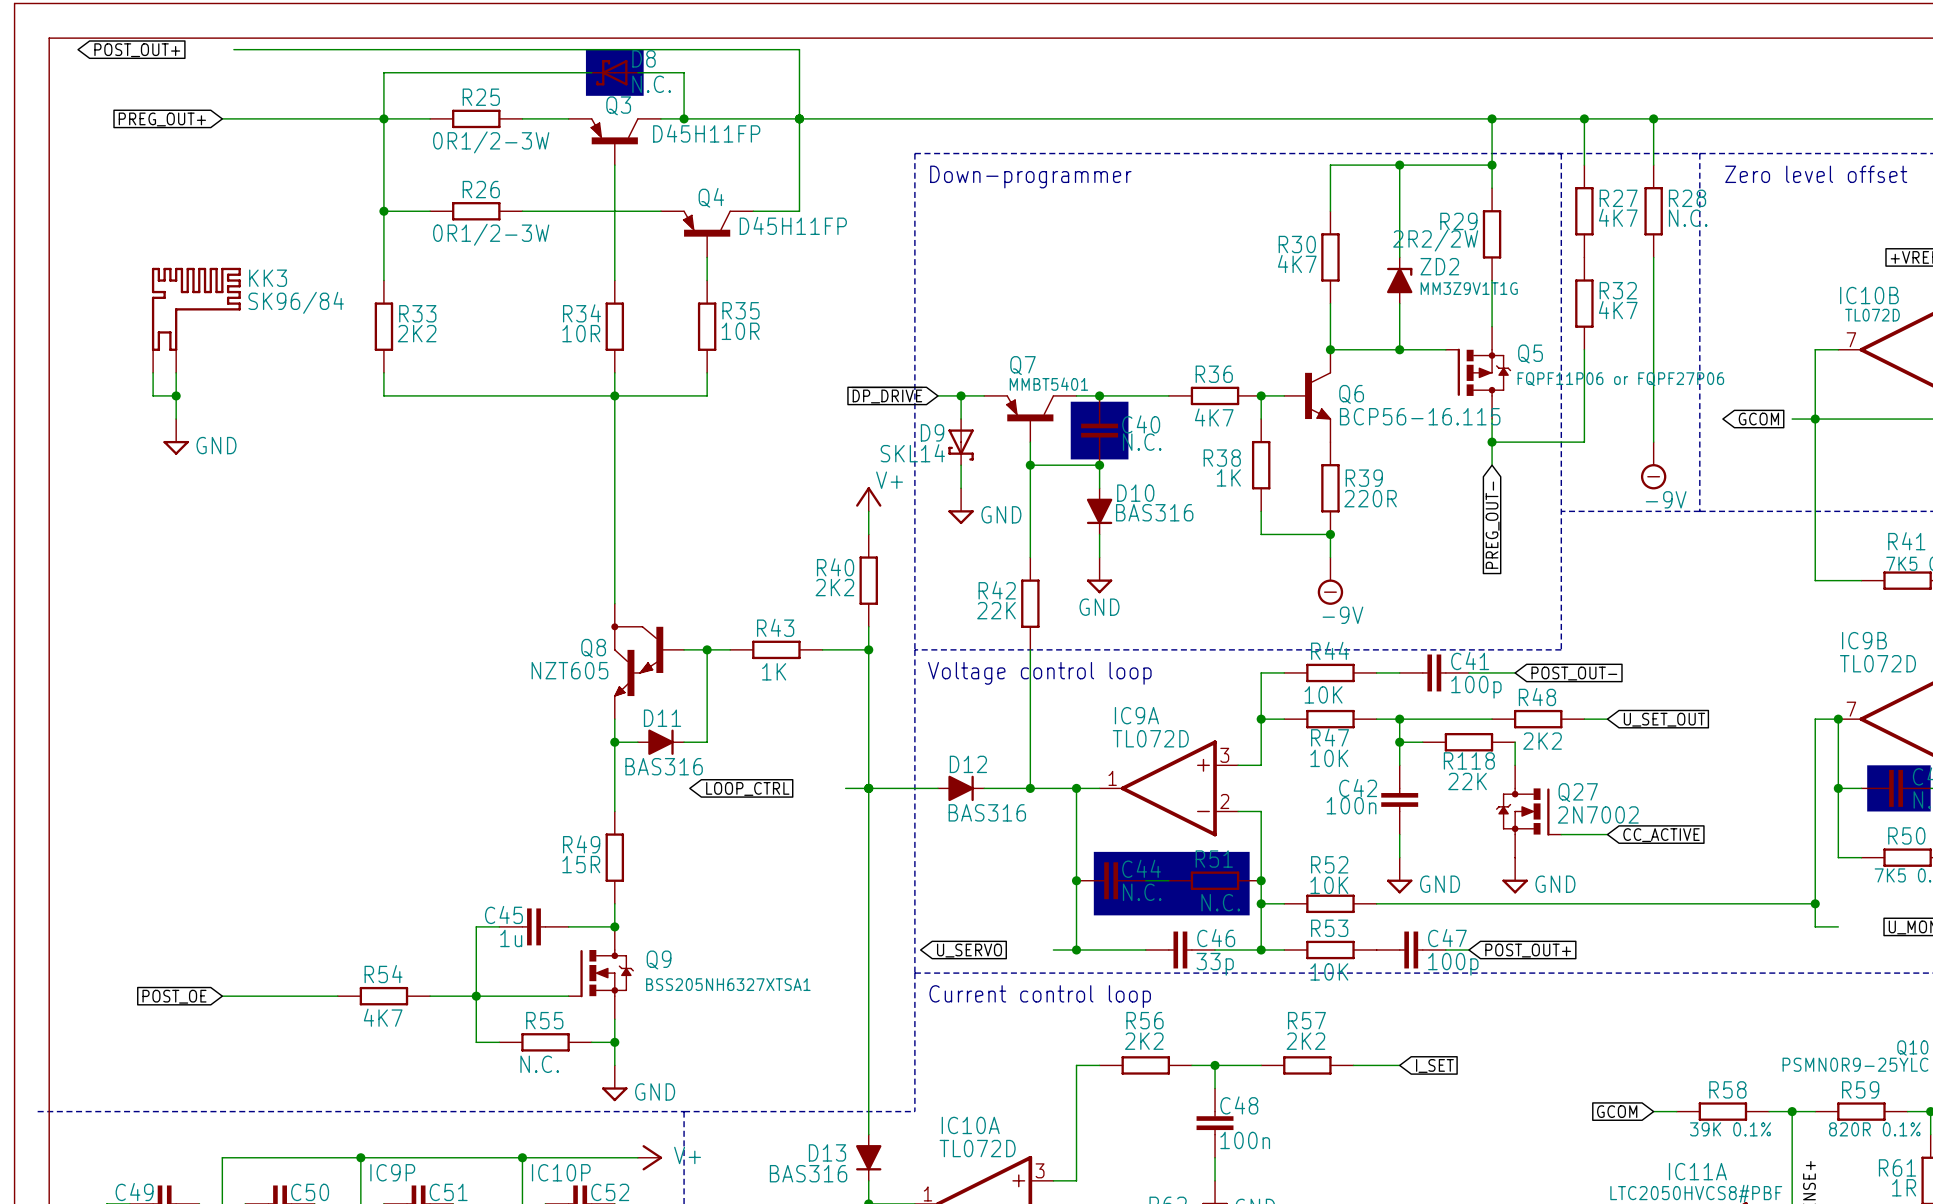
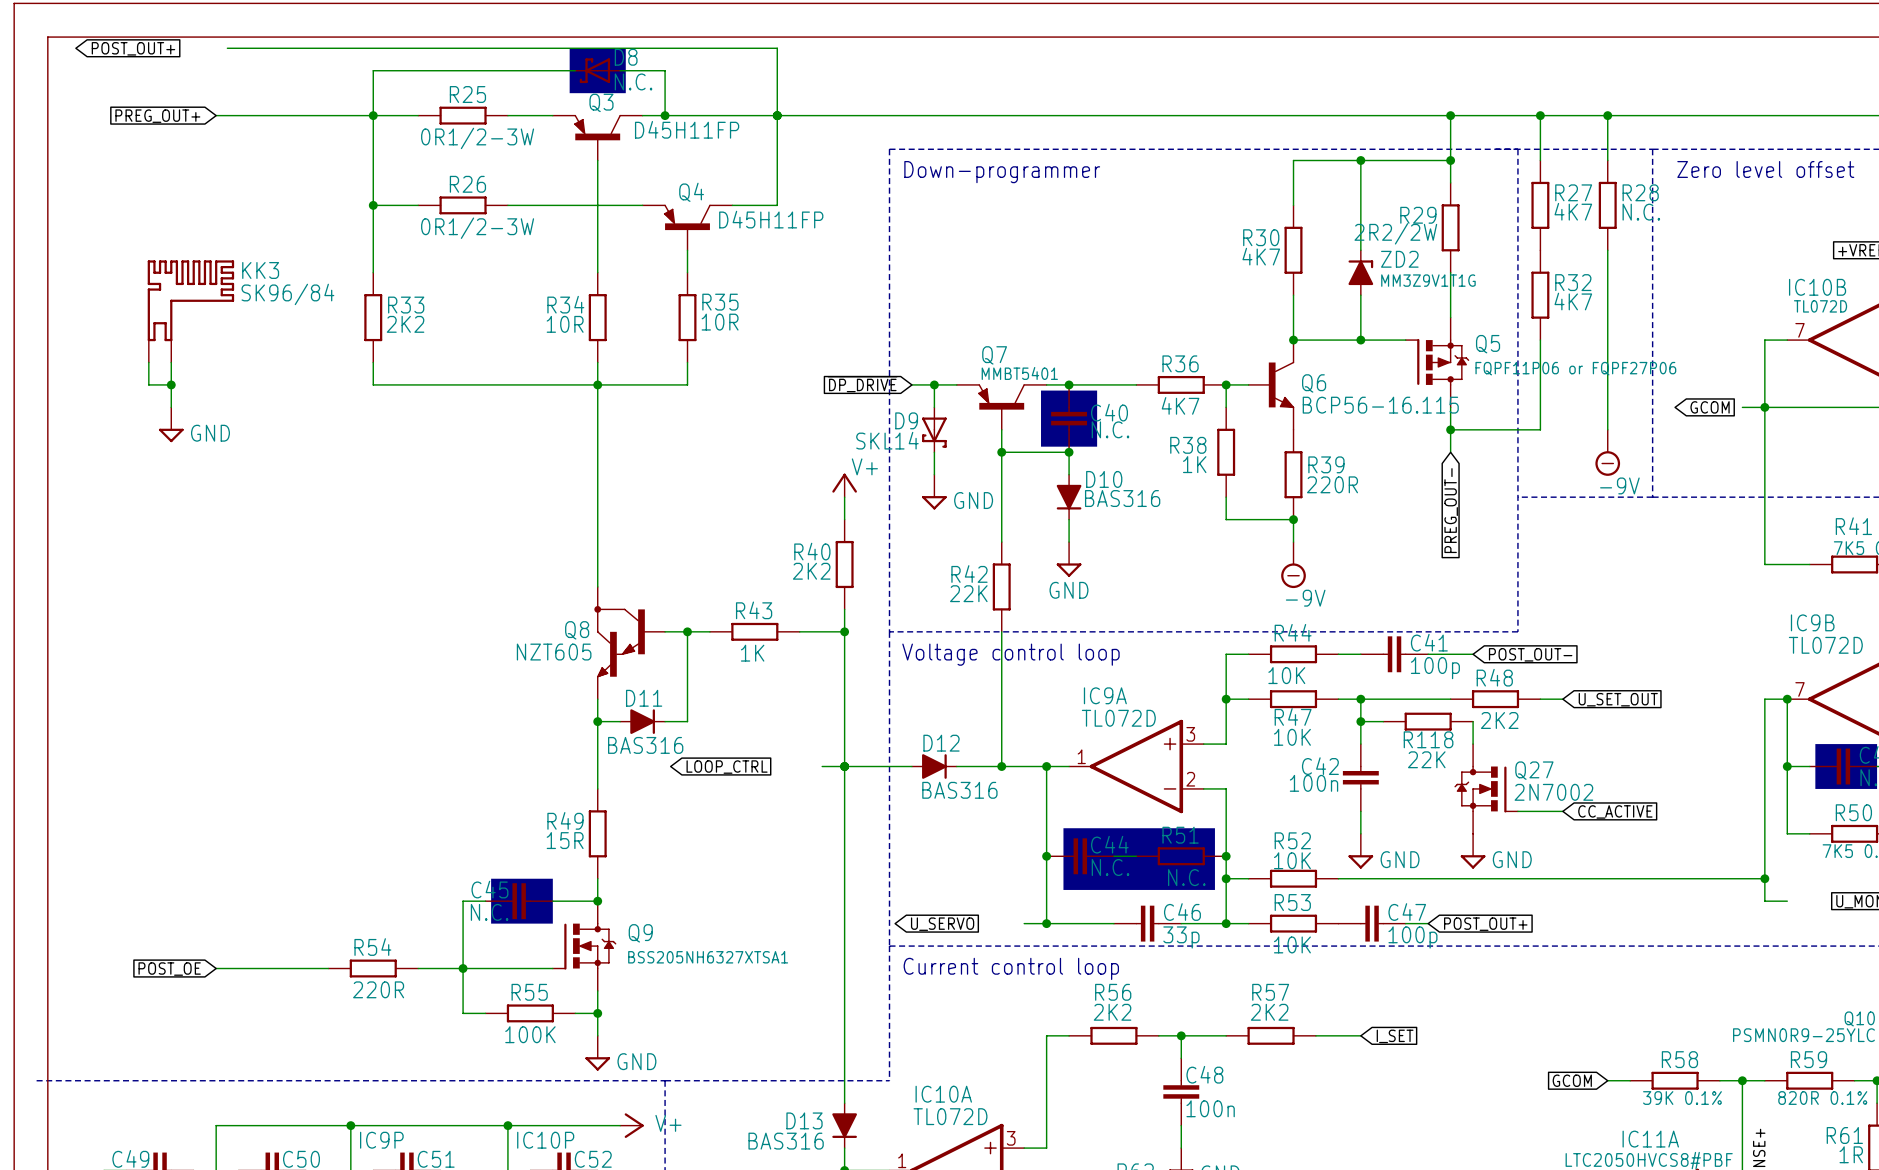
drawing: none -> [491, 878, 553, 924]
C45 value: 1u (511, 938) -> N.C. (489, 912)
R54 value: 4K7 (383, 1017) -> 220R (378, 989)
R55 value: N.C. (539, 1064) -> 100K (530, 1034)

